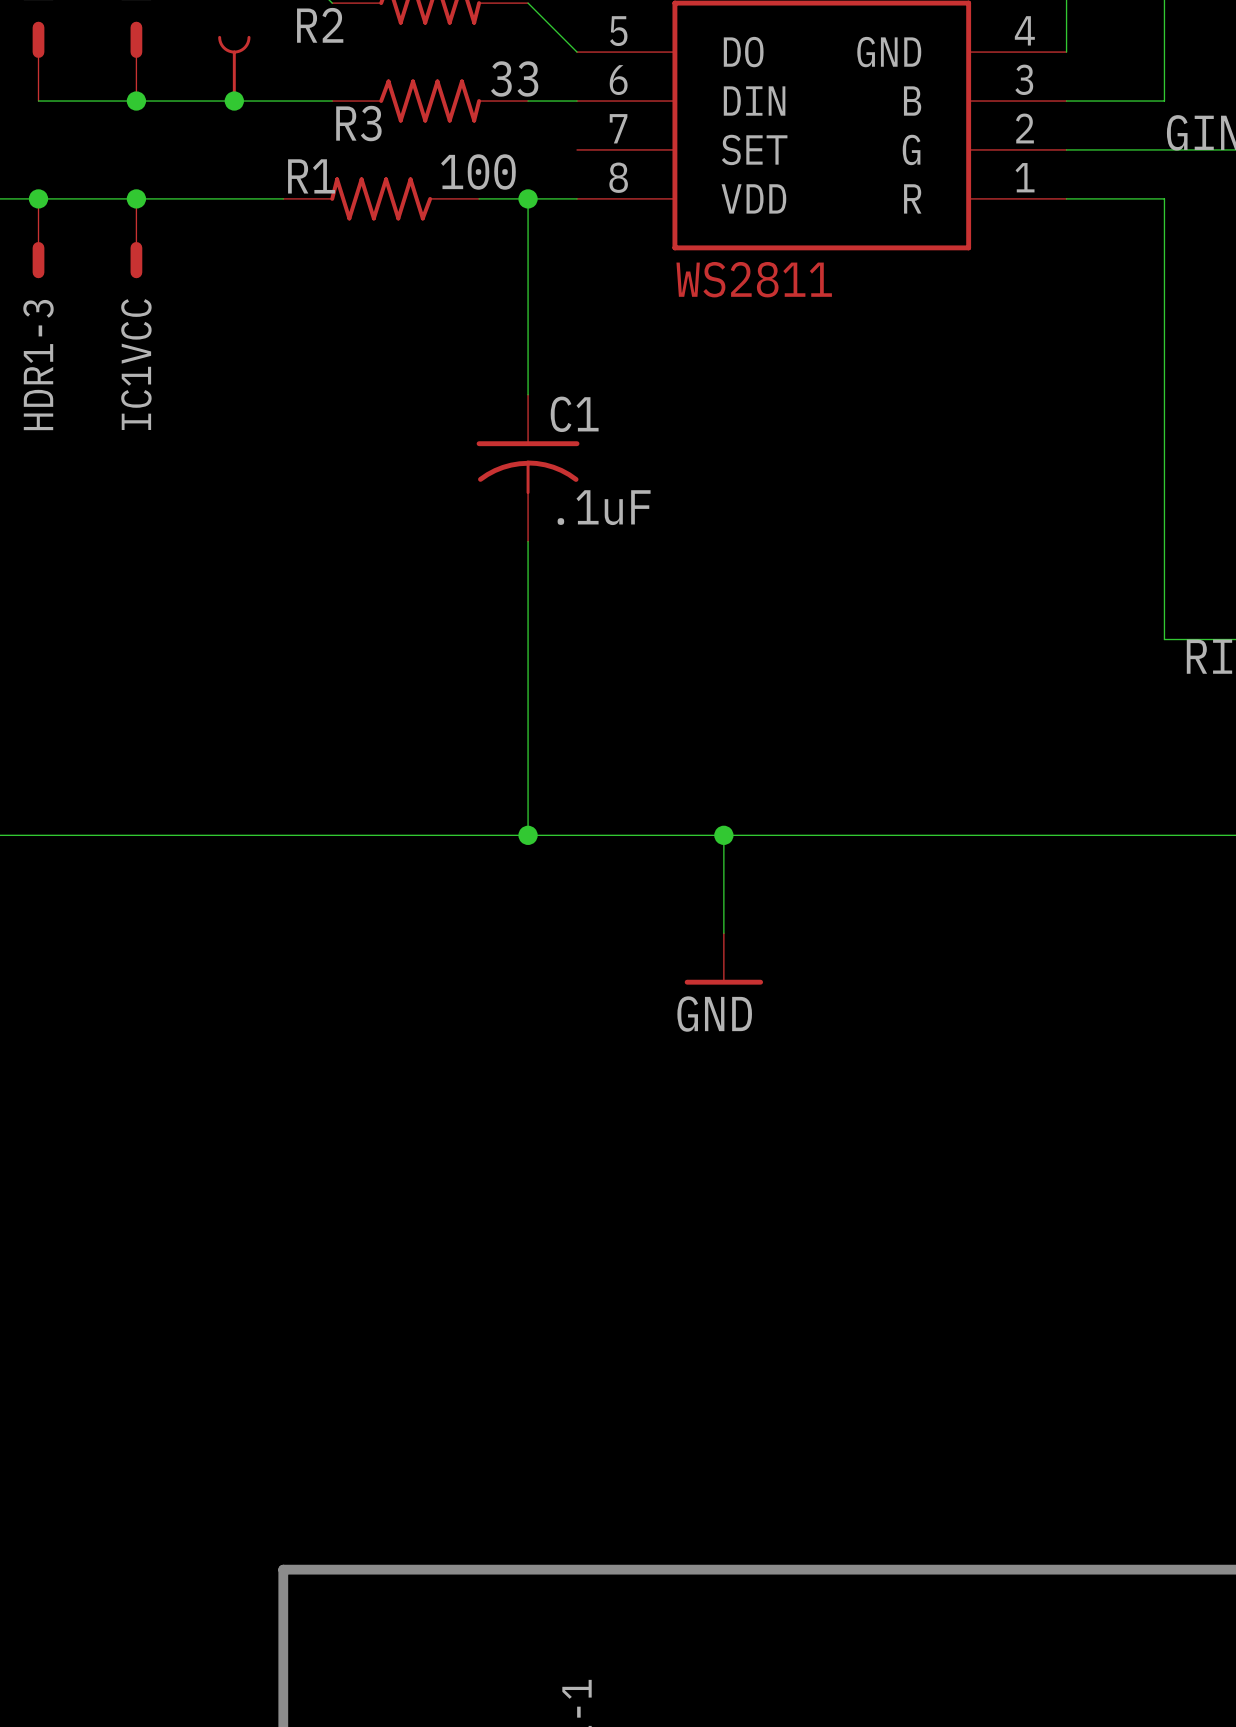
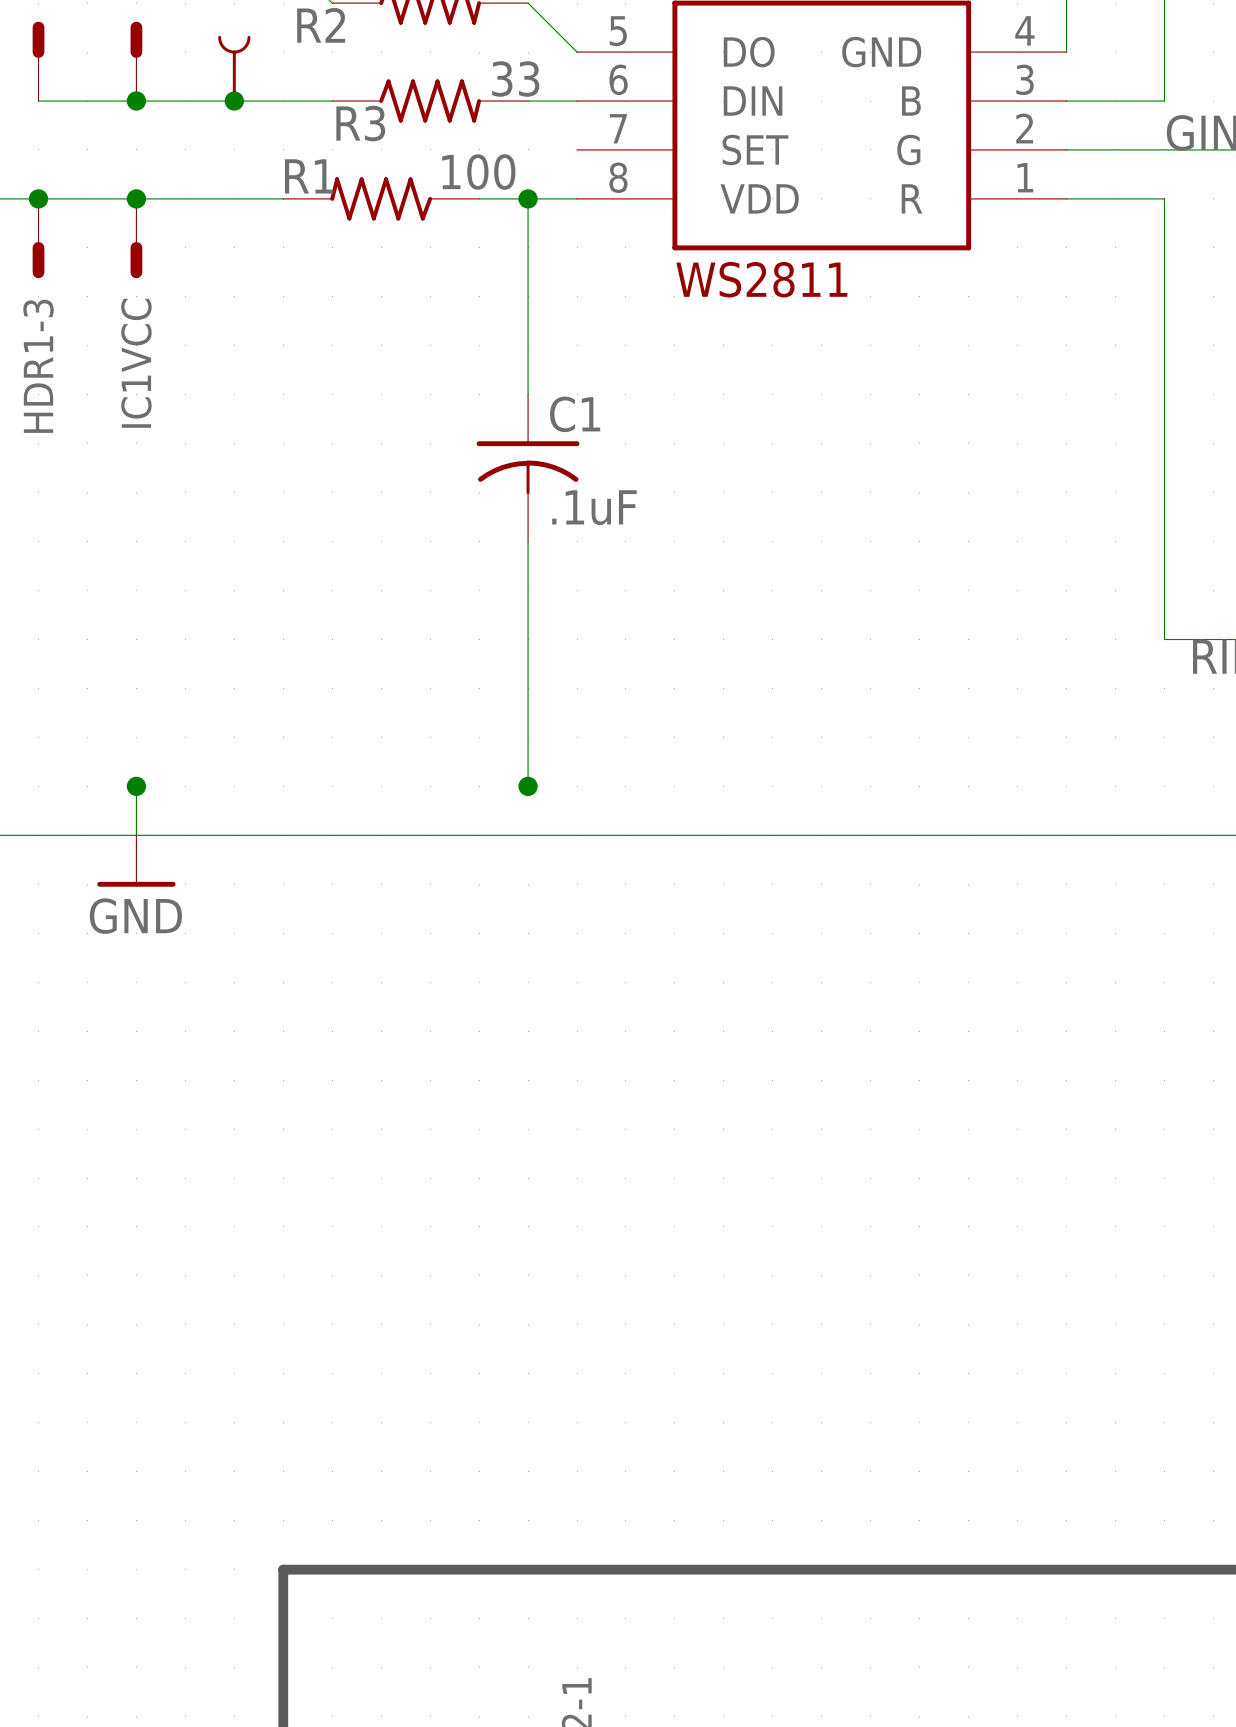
junction: none -> (136, 786)
wire: (528, 786) (528, 835) -> (136, 786) (136, 835)
junction position: (528, 835) -> (528, 786)
wire: (723, 835) (723, 933) -> none
junction: (723, 835) -> none
power symbol: none -> GND (136, 861)
power symbol: GND (723, 958) -> none

